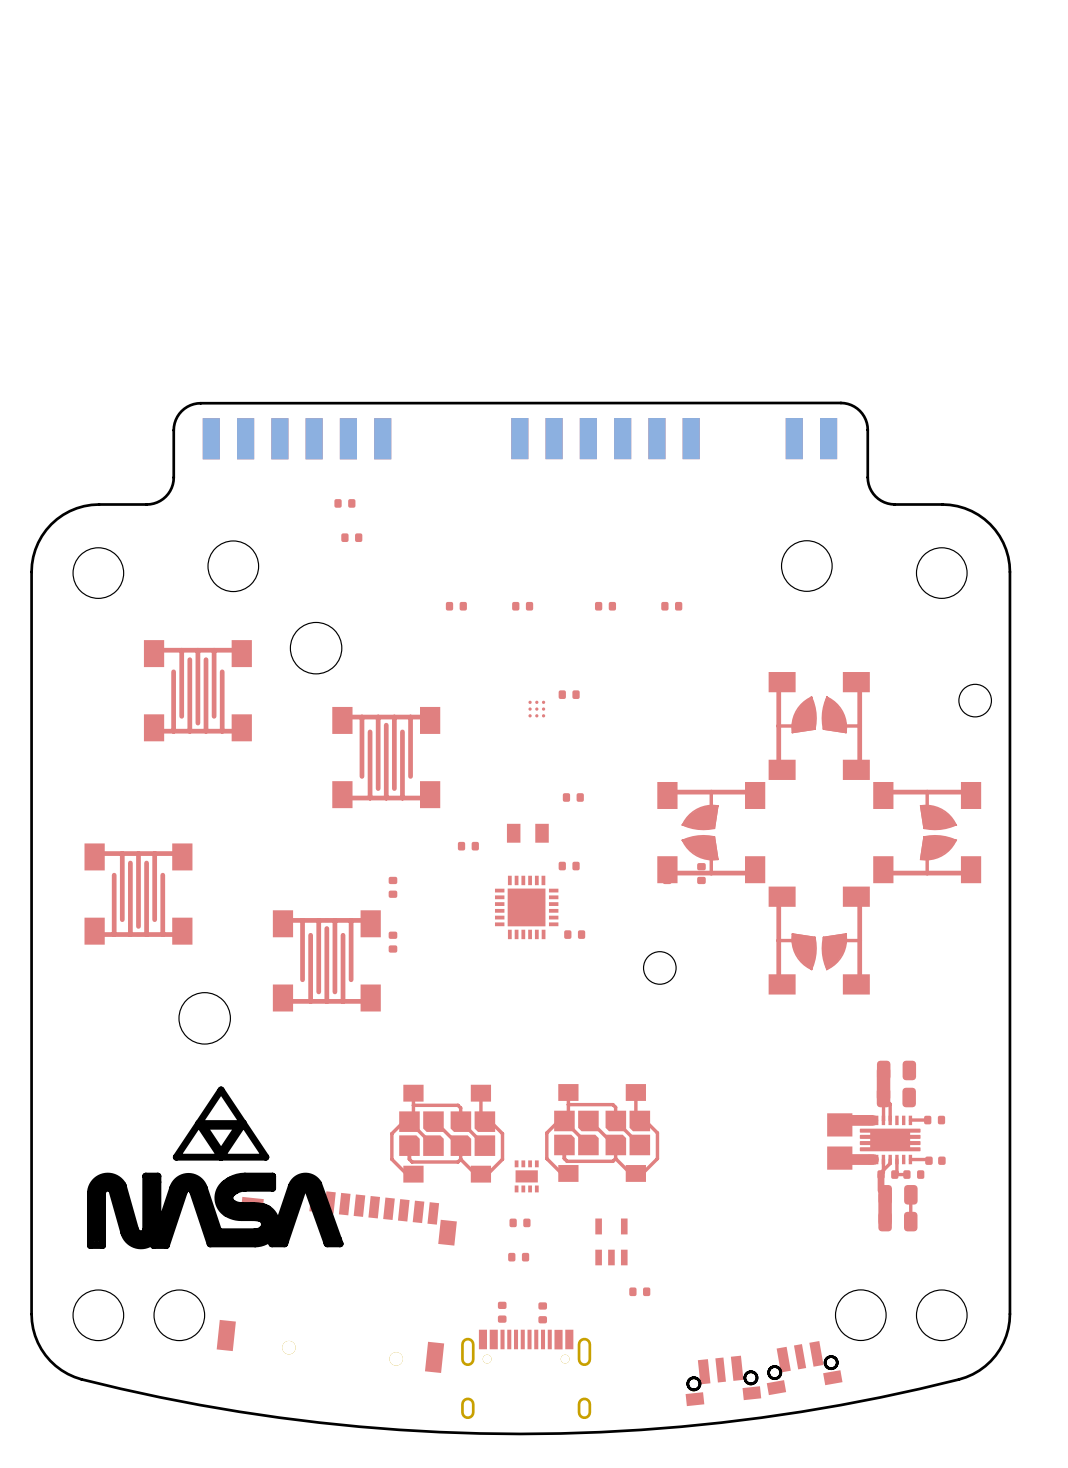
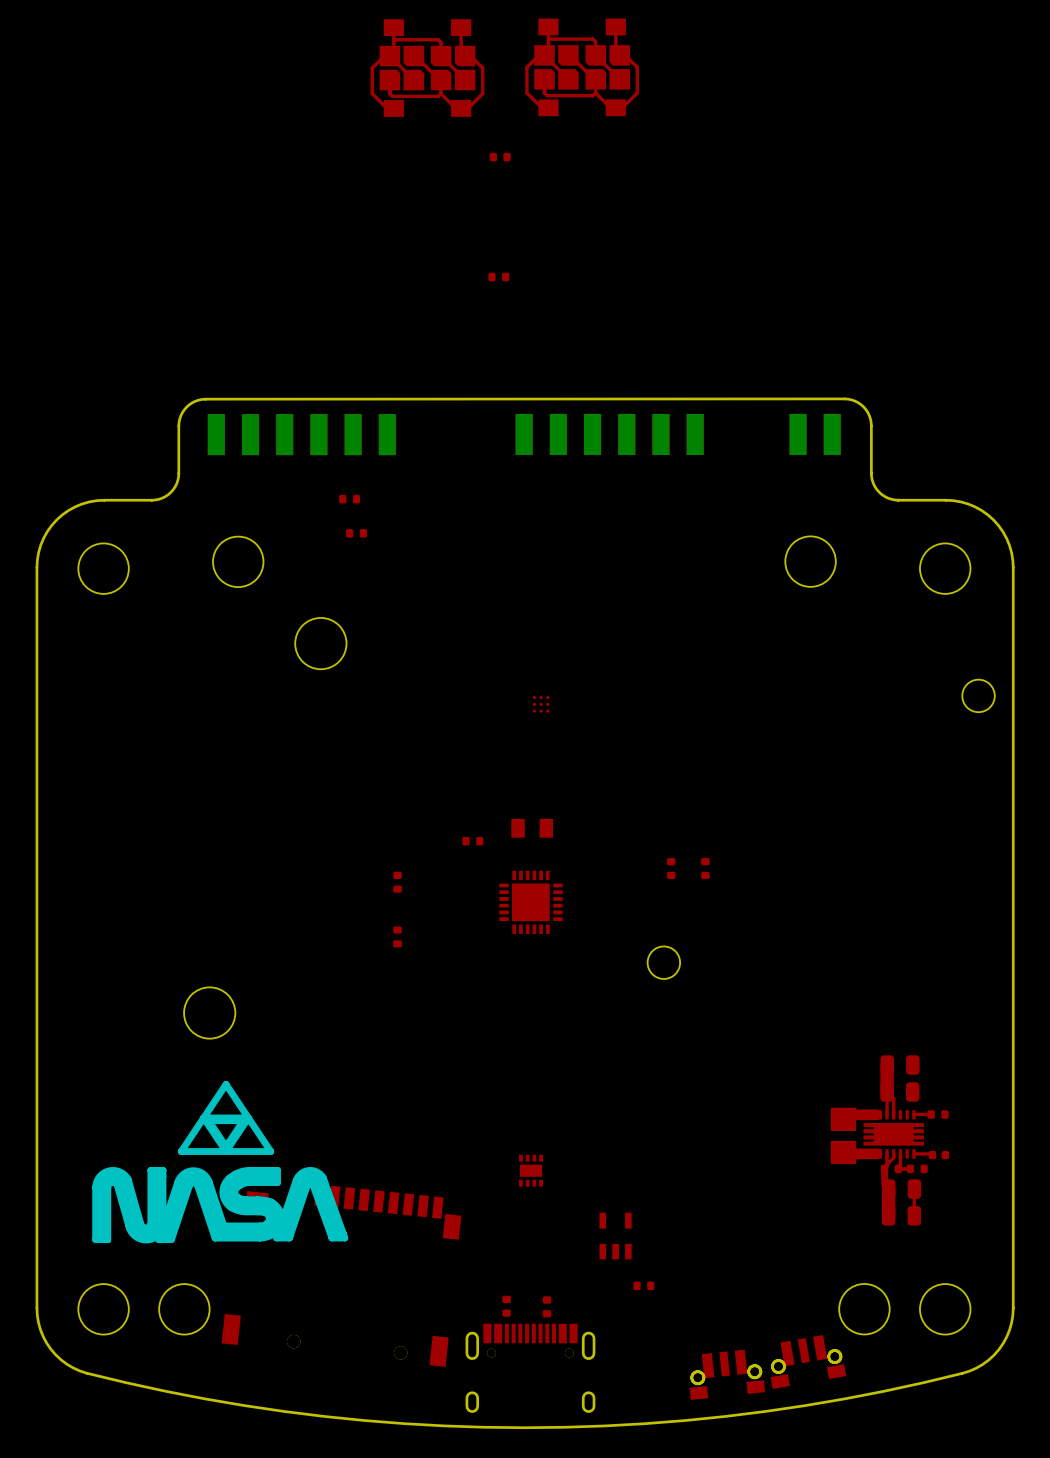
part: none -> (582, 67)
part: none -> (427, 68)
part: none -> (500, 157)
part: none -> (498, 276)
part: (456, 606) -> none
part: (522, 606) -> none
part: (605, 606) -> none
part: (671, 606) -> none
part: (197, 690) -> none
part: (569, 694) -> none
part: (819, 725) -> none
part: (386, 757) -> none
part: (573, 797) -> none
part: (711, 832) -> none
part: (927, 832) -> none
part: (569, 866) -> none
part: (138, 894) -> none
part: (574, 934) -> none
part: (819, 940) -> none
part: (326, 960) -> none
part: (602, 1132) -> none
part: (447, 1133) -> none
part: (520, 1222) -> none
part: (518, 1257) -> none

